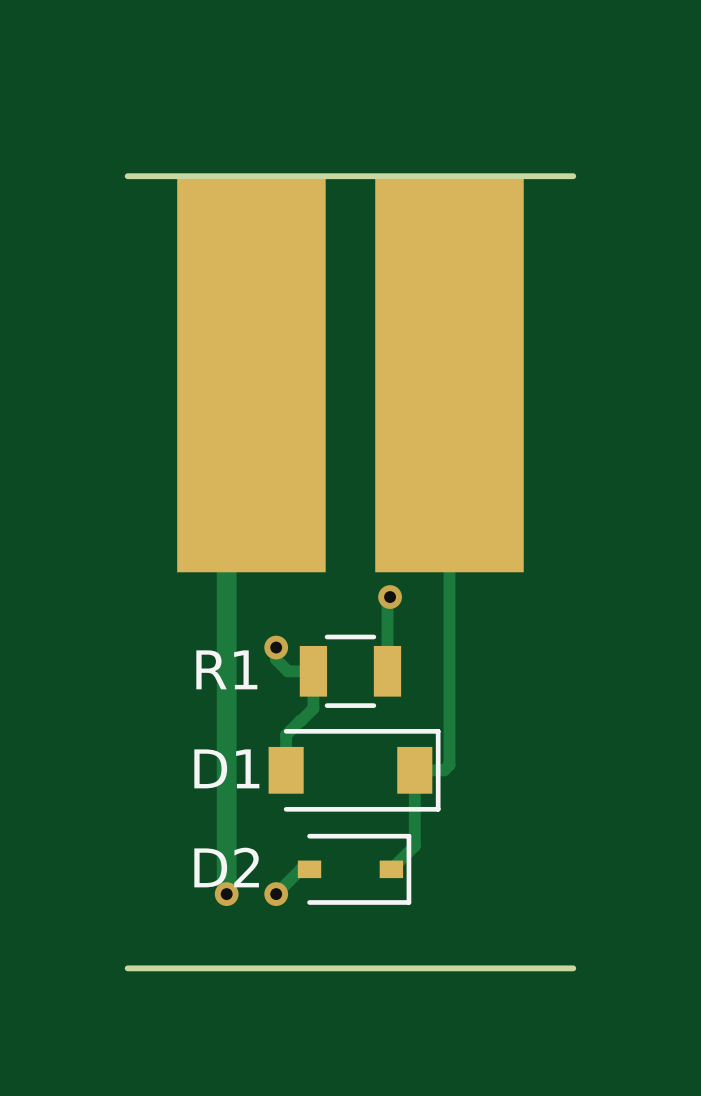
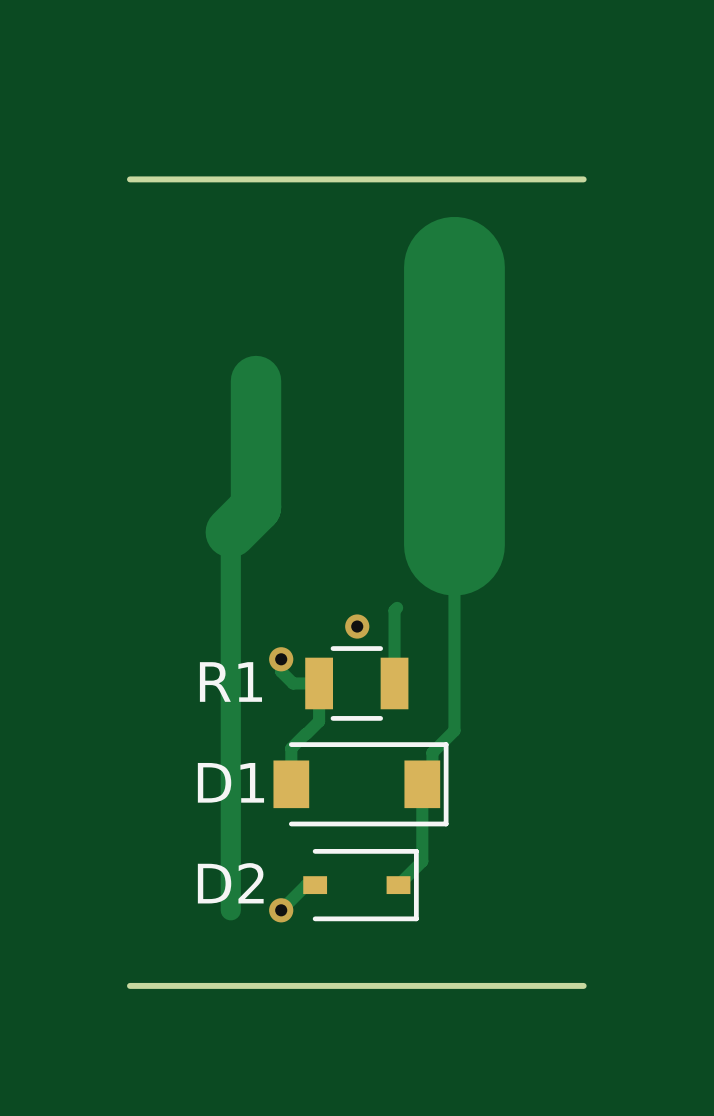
part: (251, 374) -> none
track: (449, 374) (449, 765) (444, 770) (424, 770) -> (454, 267) (454, 730) (432, 752) (432, 784)
part: (449, 374) -> none
via position: (390, 597) -> (357, 626)
via: (226, 894) -> none

